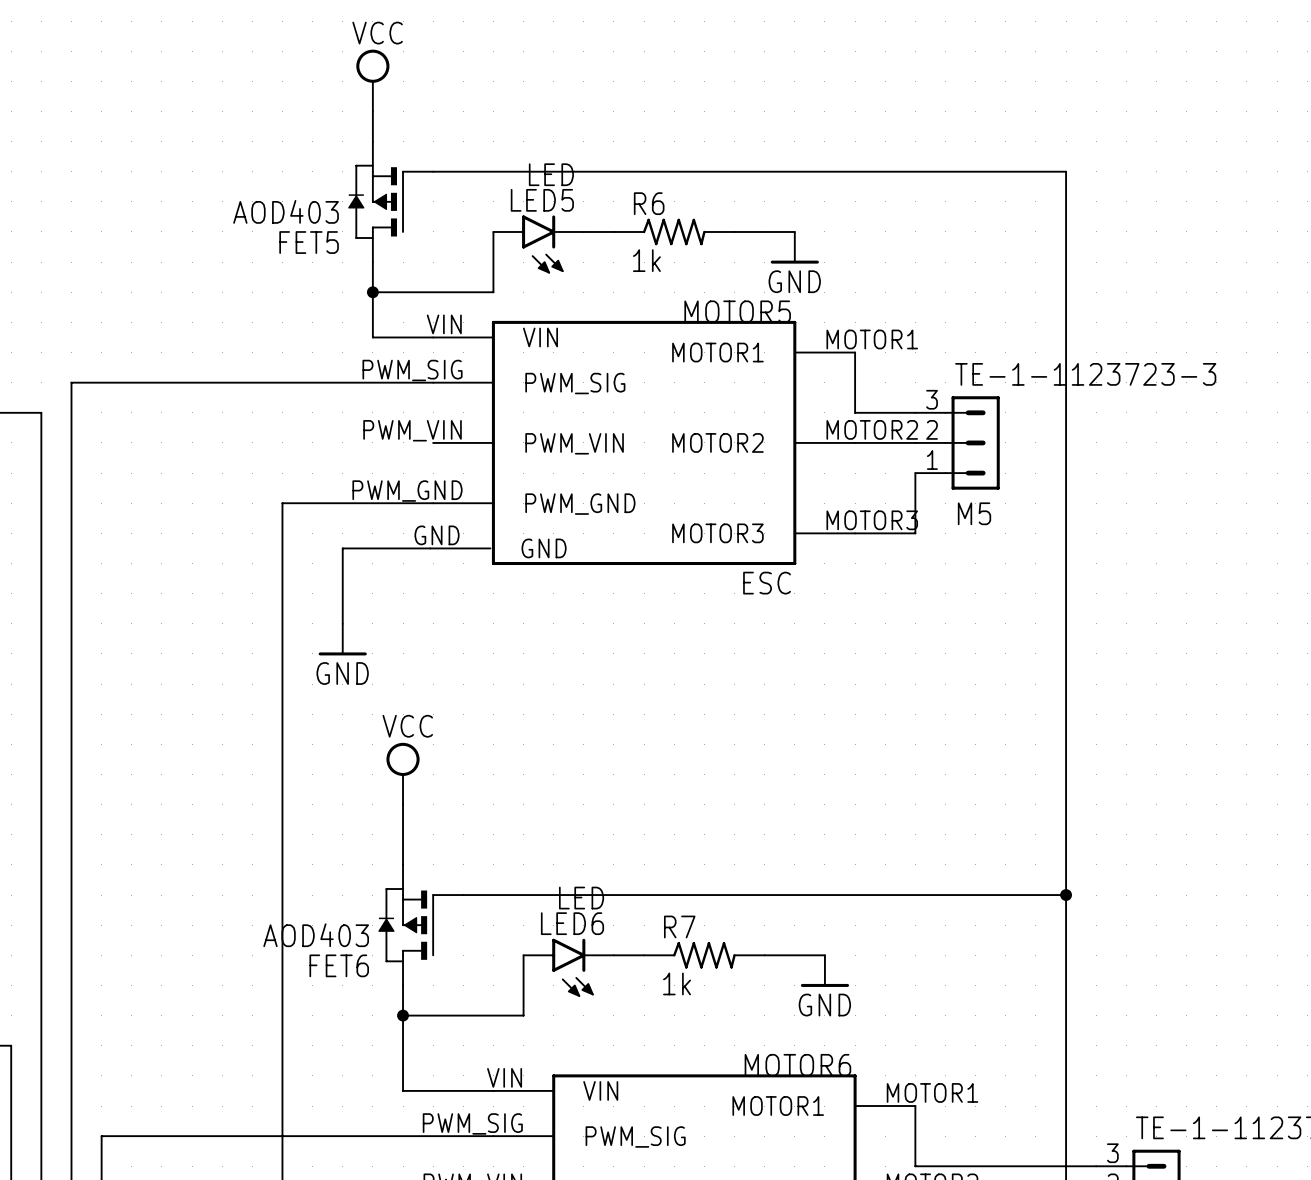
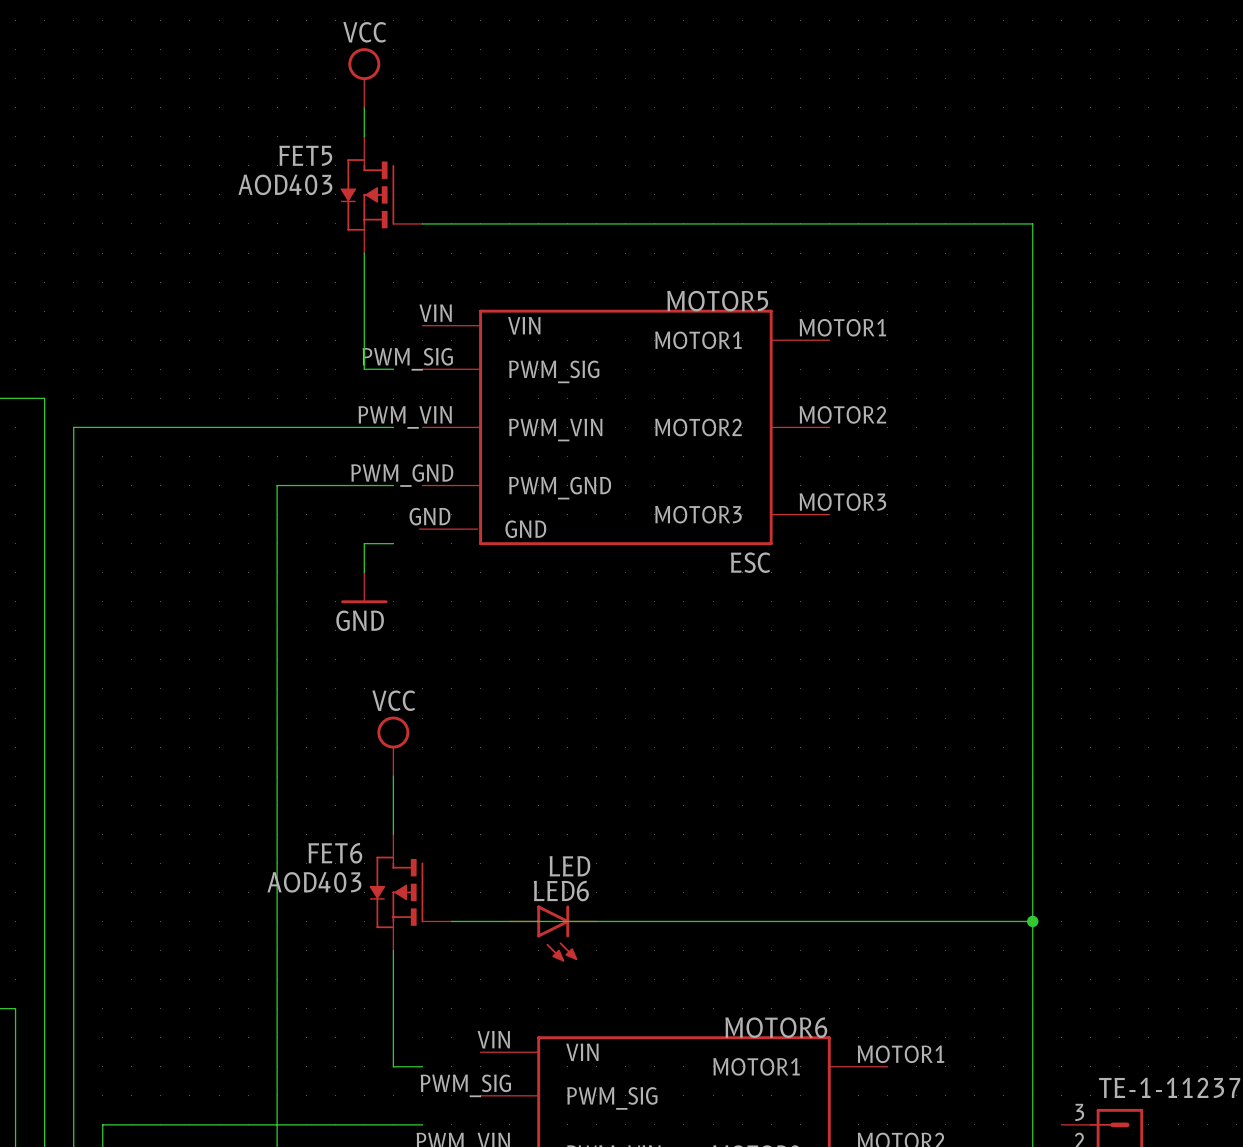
wire: (433, 171) (1066, 171) (1066, 231) -> (771, 223) (1032, 223)
FET5 flip: as is (376, 201) -> up-down (367, 194)
wire: none -> (422, 223) (567, 223)
wire: (493, 231) (493, 292) (372, 292) -> none
R6: 1k (674, 231) -> none
LED5: LED (538, 244) -> none
power symbol: GND (794, 247) -> none
junction: (372, 292) -> none
wire: (372, 337) (433, 337) -> (364, 325) (364, 369)
wire: (855, 352) (855, 412) (915, 412) -> none
wire: (372, 382) (71, 382) (71, 442) -> (393, 427) (73, 427)
wire: (403, 382) (433, 382) -> none
wire: (855, 442) (915, 442) -> none
M5: TE-1-1123723-3 (957, 442) -> none
wire: (915, 473) (915, 533) (855, 533) -> none
wire: (403, 503) (433, 503) -> none
wire: (430, 548) (342, 548) (342, 623) -> none
wire: none -> (393, 543) (364, 543) (364, 572)
power symbol position: GND (342, 639) -> GND (364, 587)
wire: (463, 895) (1066, 895) -> none
junction position: (1066, 895) -> (1032, 921)
FET6 flip: as is (406, 925) -> up-down (396, 892)
wire: none -> (451, 921) (596, 921)
wire: (523, 955) (523, 1015) (403, 1015) -> none
R7: 1k (704, 955) -> none
wire: none -> (800, 921) (1032, 921)
power symbol: GND (824, 971) -> none
junction: (403, 1015) -> none
wire: (403, 1090) (493, 1090) -> (393, 1052) (393, 1066) (422, 1066)
wire: (915, 1106) (915, 1166) (1096, 1166) -> none
wire: (493, 1136) (101, 1136) (101, 1166) -> (422, 1124) (102, 1124)

